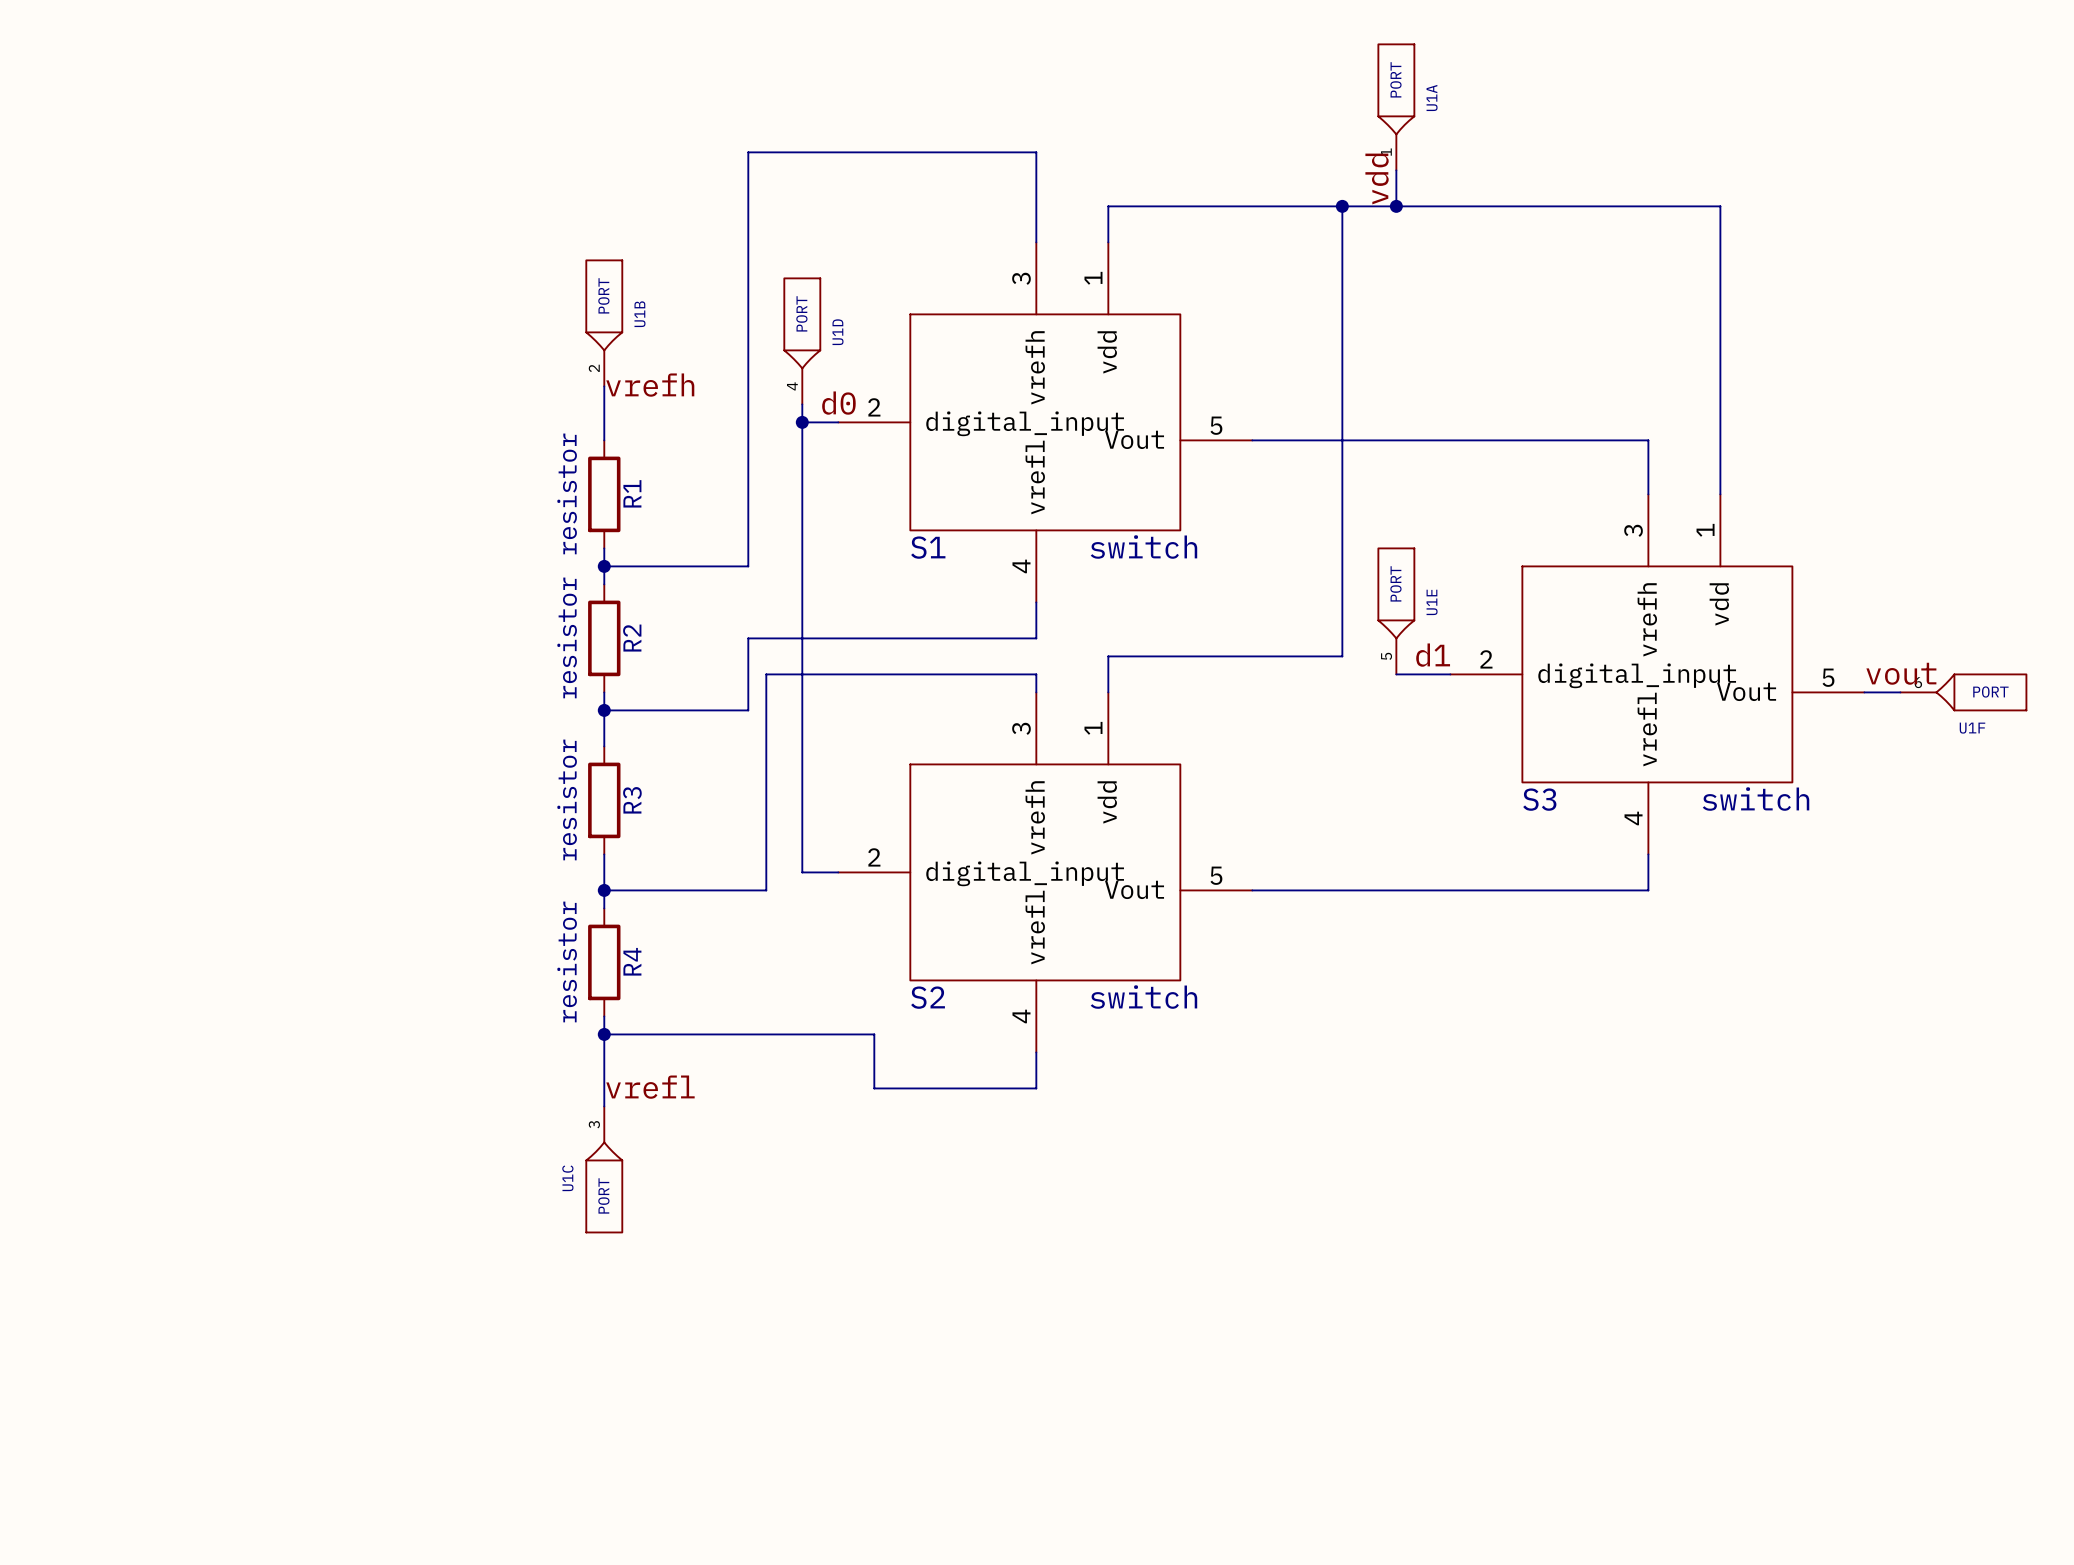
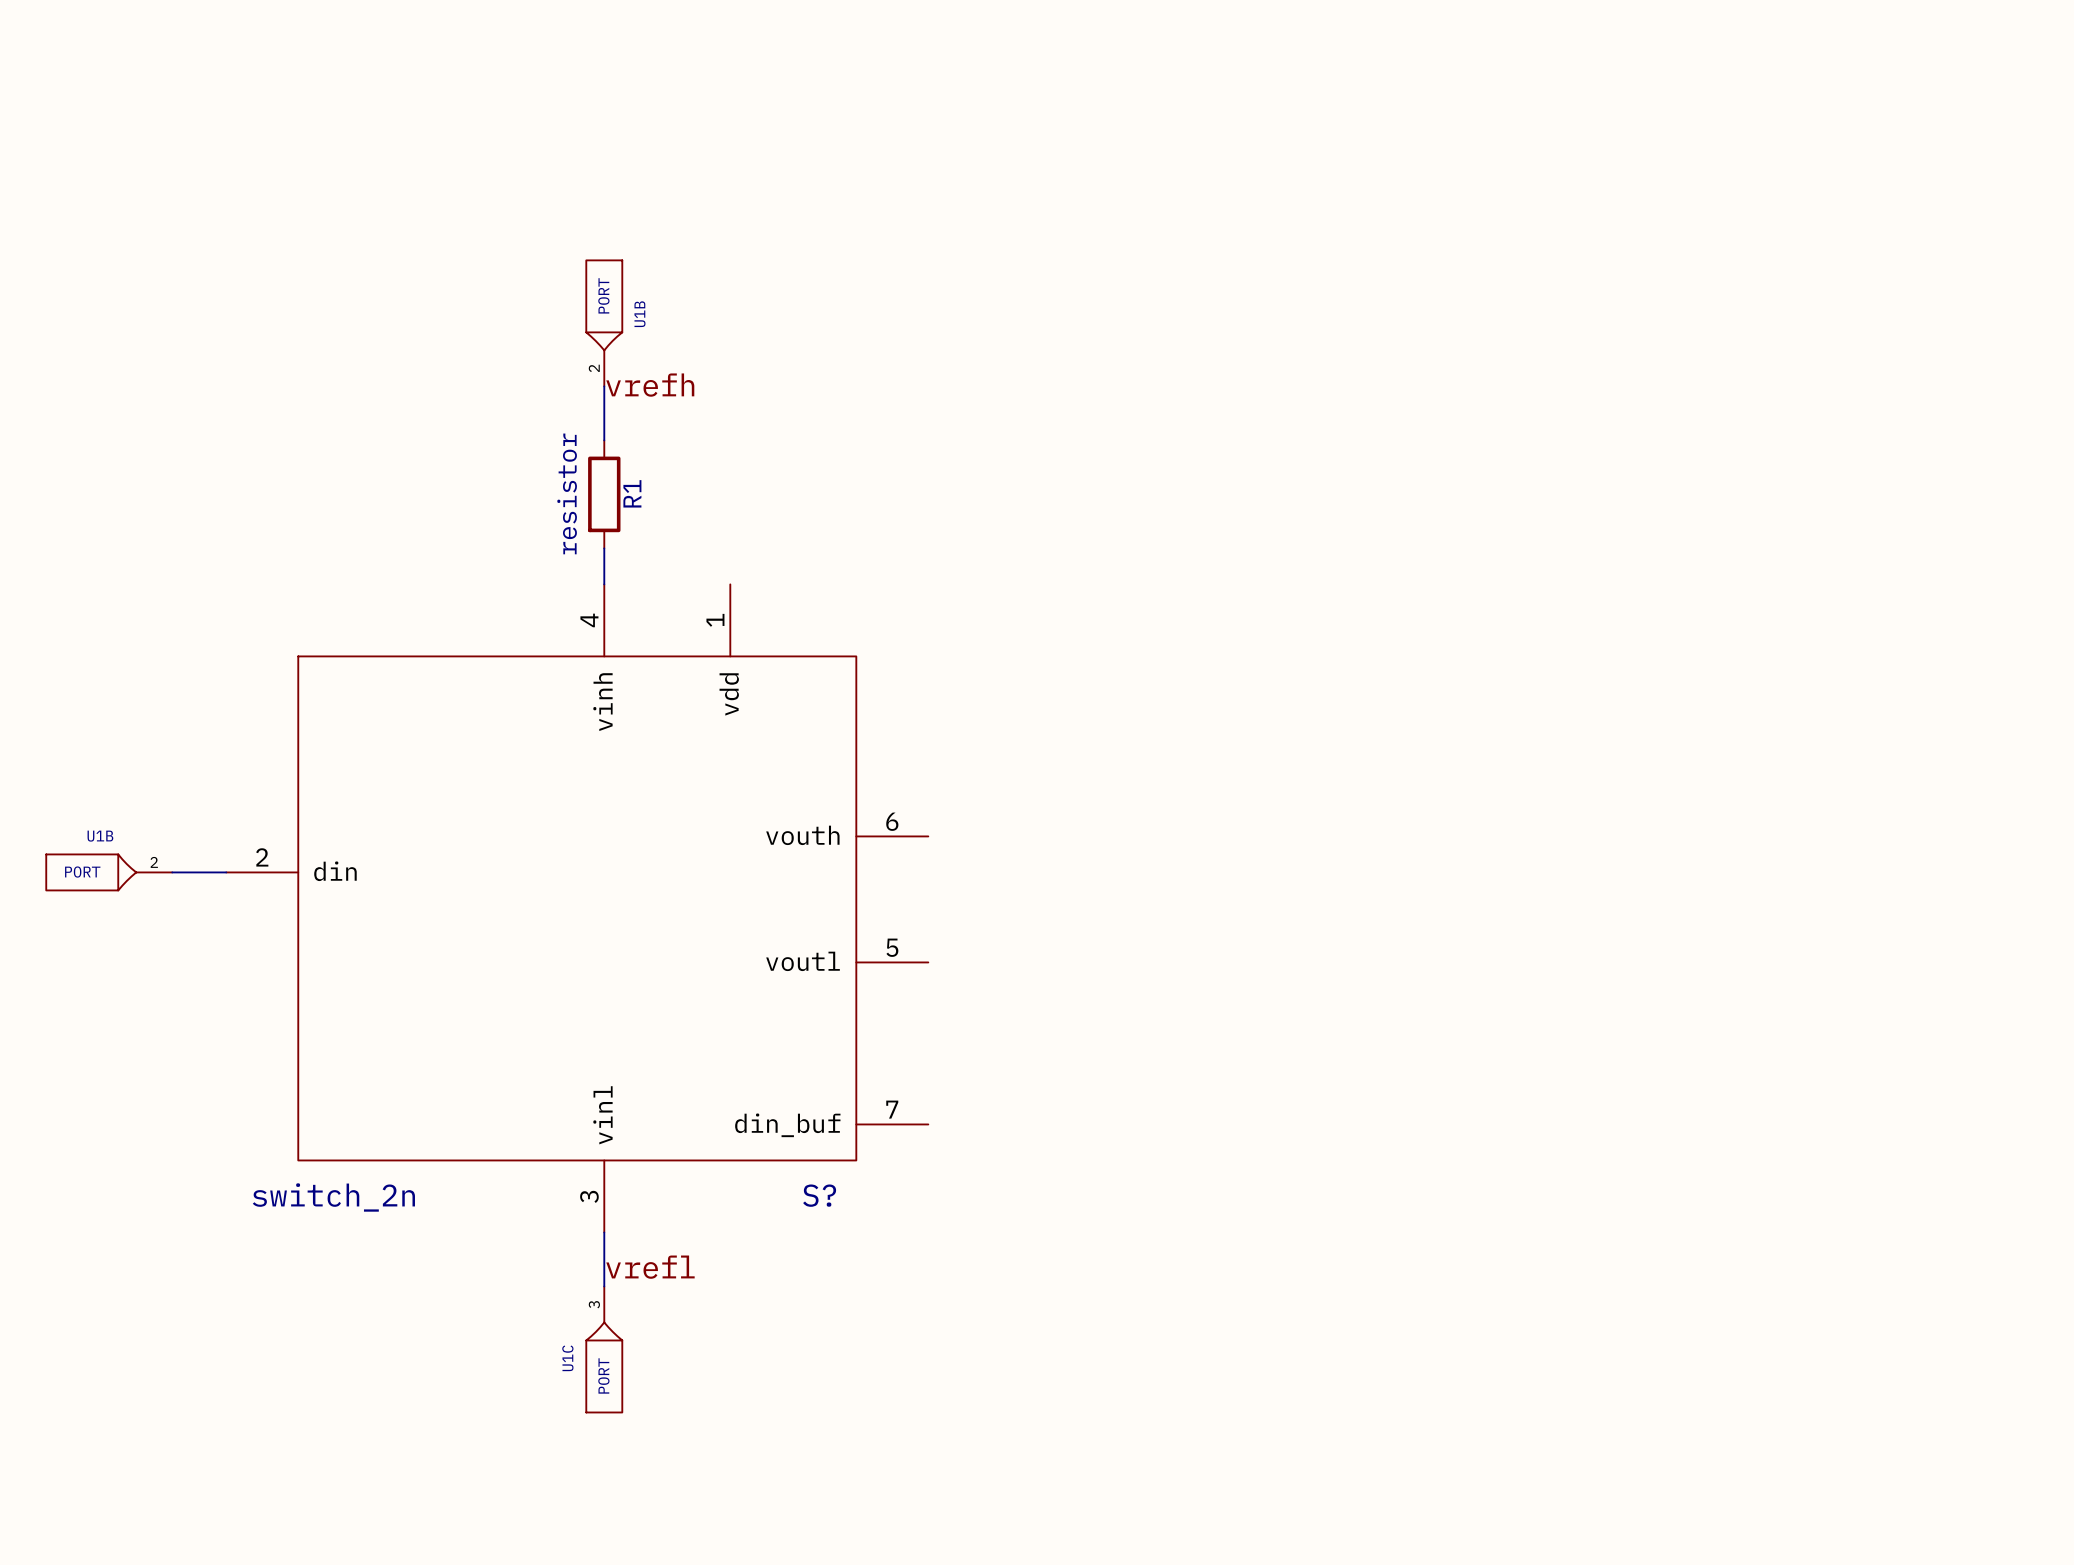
U1A: PORT (1396, 107) -> none
wire: (1396, 170) (1396, 206) -> none
label: vdd (1377, 178) -> none
wire: (1342, 206) (1342, 656) (1108, 656) (1108, 692) -> none
junction: (1342, 206) -> none
junction: (1396, 206) -> none
wire: (1036, 242) (1036, 152) (748, 152) (748, 566) (604, 566) -> none
wire: (1108, 242) (1108, 206) (1720, 206) (1720, 494) -> none
U1D: PORT (802, 341) -> none
label: d0 (838, 403) -> none
wire: (802, 404) (802, 872) (838, 872) -> none
wire: (802, 422) (838, 422) -> none
junction: (802, 422) -> none
S1: switch (1045, 422) -> none
wire: (1252, 440) (1648, 440) (1648, 494) -> none
junction: (604, 566) -> none
wire: (1036, 602) (1036, 638) (748, 638) (748, 710) (604, 710) -> none
U1E: PORT (1396, 611) -> none
R2: resistor (604, 638) -> none
label: d1 (1433, 655) -> none
label: vout (1901, 673) -> none
wire: (1396, 674) (1450, 674) -> none
S3: switch (1657, 674) -> none
wire: (604, 692) (604, 746) -> none
wire: (1036, 692) (1036, 674) (766, 674) (766, 890) (604, 890) -> none
wire: (1864, 692) (1900, 692) -> none
U1F: PORT (1963, 692) -> none
junction: (604, 710) -> none
R3: resistor (604, 800) -> none
wire: (604, 854) (604, 908) -> none
wire: (1648, 854) (1648, 890) (1252, 890) -> none
U1B: none -> PORT (109, 872)
wire: none -> (172, 872) (226, 872)
S2: switch (1045, 872) -> none
junction: (604, 890) -> none
R4: resistor (604, 962) -> none
S?: none -> switch_2n (604, 962)
wire: (604, 1016) (604, 1106) -> none
wire: (604, 1034) (874, 1034) (874, 1088) (1036, 1088) (1036, 1052) -> none
junction: (604, 1034) -> none
label position: vrefl (650, 1087) -> vrefl (650, 1267)
U1C position: (604, 1169) -> (604, 1349)
wire: none -> (604, 1232) (604, 1286)

